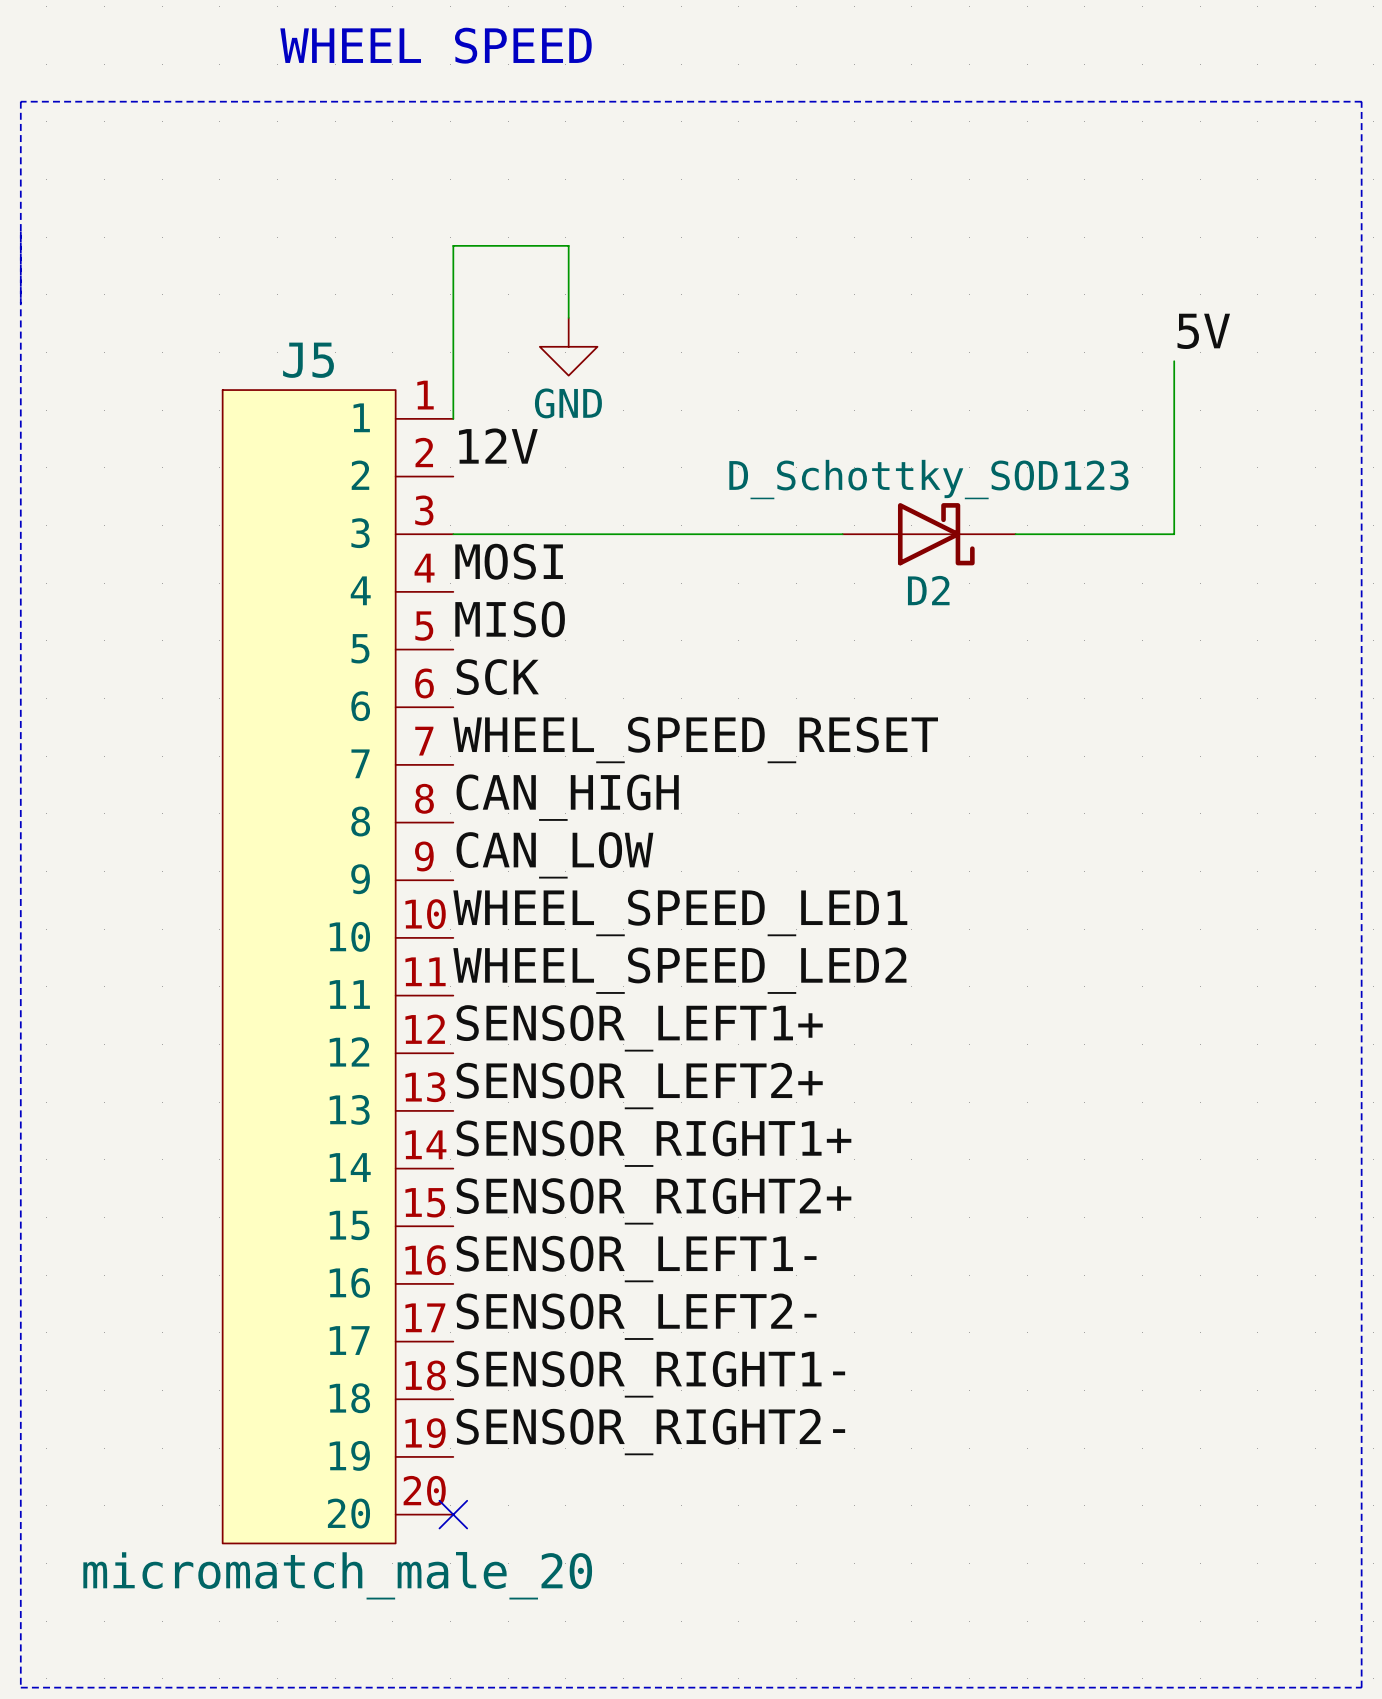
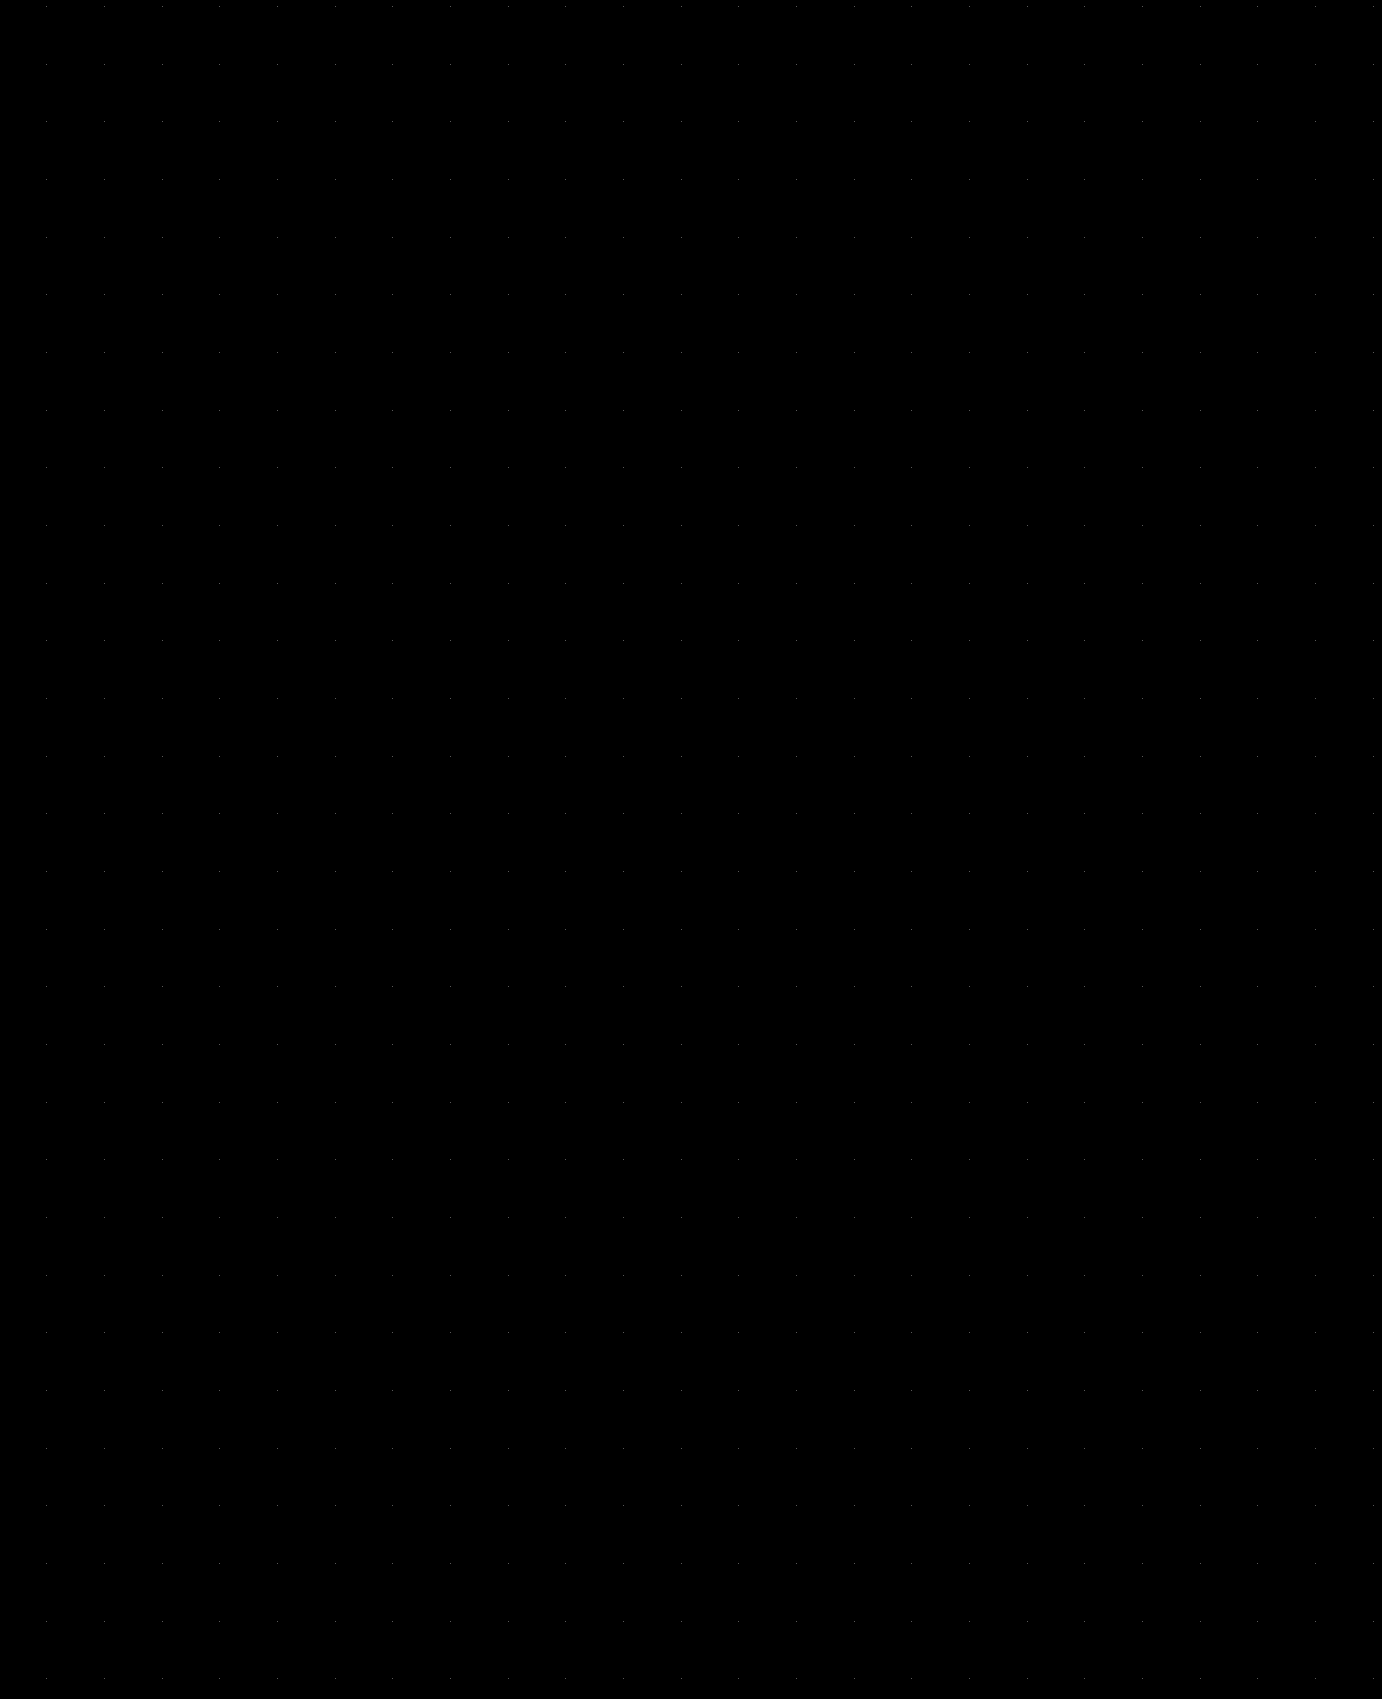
text: WHEEL SPEED (436, 45) -> none
line: (20, 101) (20, 1687) (1361, 1687) (1361, 101) (20, 101) -> none
wire: (568, 317) (568, 245) (453, 245) (453, 418) -> none
label: 5V (1203, 331) -> none
power symbol: GND (568, 346) -> none
wire: (1174, 361) (1174, 534) (1015, 534) -> none
label: 12V (498, 446) -> none
wire: (453, 534) (842, 534) -> none
D2: D_Schottky_SOD123 (929, 534) -> none
label: MOSI (509, 561) -> none
label: MISO (510, 619) -> none
label: SCK (497, 677) -> none
label: WHEEL_SPEED_RESET (695, 740) -> none
label: CAN_HIGH (567, 797) -> none
label: CAN_LOW (554, 855) -> none
label: WHEEL_SPEED_LED1 (680, 913) -> none
J5: micromatch_male_20 (337, 966) -> none
label: WHEEL_SPEED_LED2 (679, 970) -> none
label: SENSOR_LEFT1+ (639, 1028) -> none
label: SENSOR_LEFT2+ (639, 1086) -> none
label: SENSOR_RIGHT1+ (653, 1143) -> none
label: SENSOR_RIGHT2+ (653, 1201) -> none
label: SENSOR_LEFT1- (636, 1259) -> none
label: SENSOR_LEFT2- (636, 1316) -> none
label: SENSOR_RIGHT1- (650, 1374) -> none
label: SENSOR_RIGHT2- (650, 1432) -> none
no-connect mark: (453, 1514) -> none

